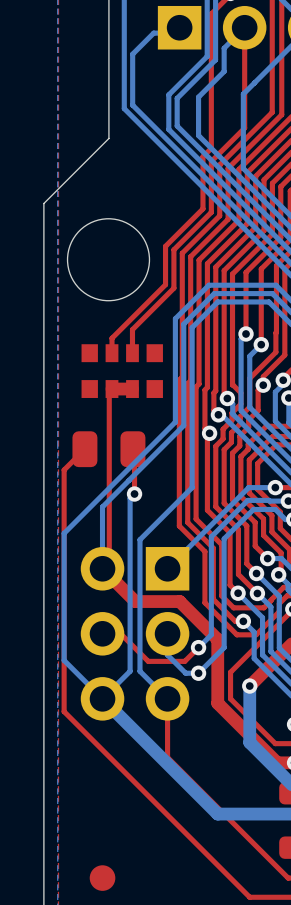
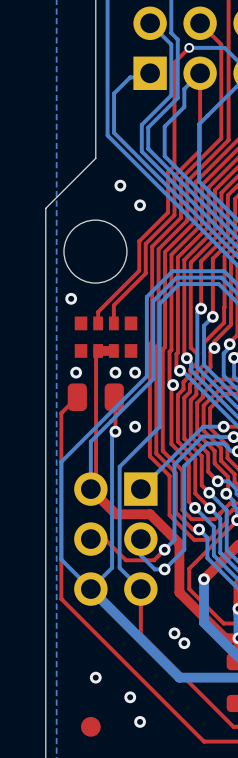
via: none -> (120, 185)
via: none -> (140, 205)
via: none -> (71, 298)
via: none -> (76, 372)
via: none -> (115, 372)
via: none -> (135, 372)
via: none -> (135, 426)
via: none -> (174, 633)
via: none -> (184, 643)
via: none -> (95, 677)
via: none -> (130, 697)
via: none -> (140, 721)

